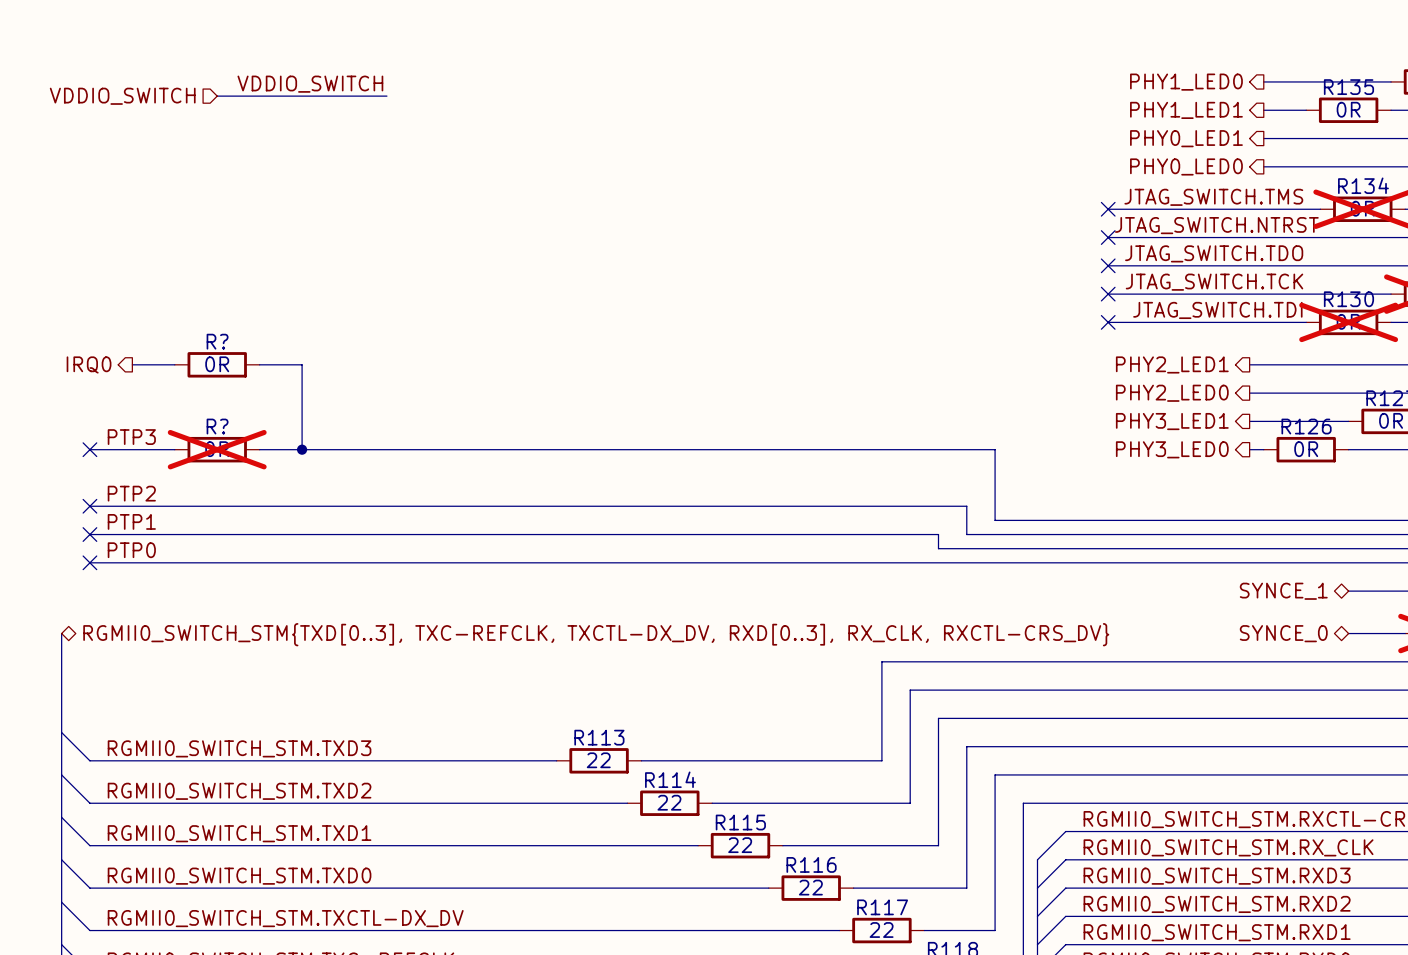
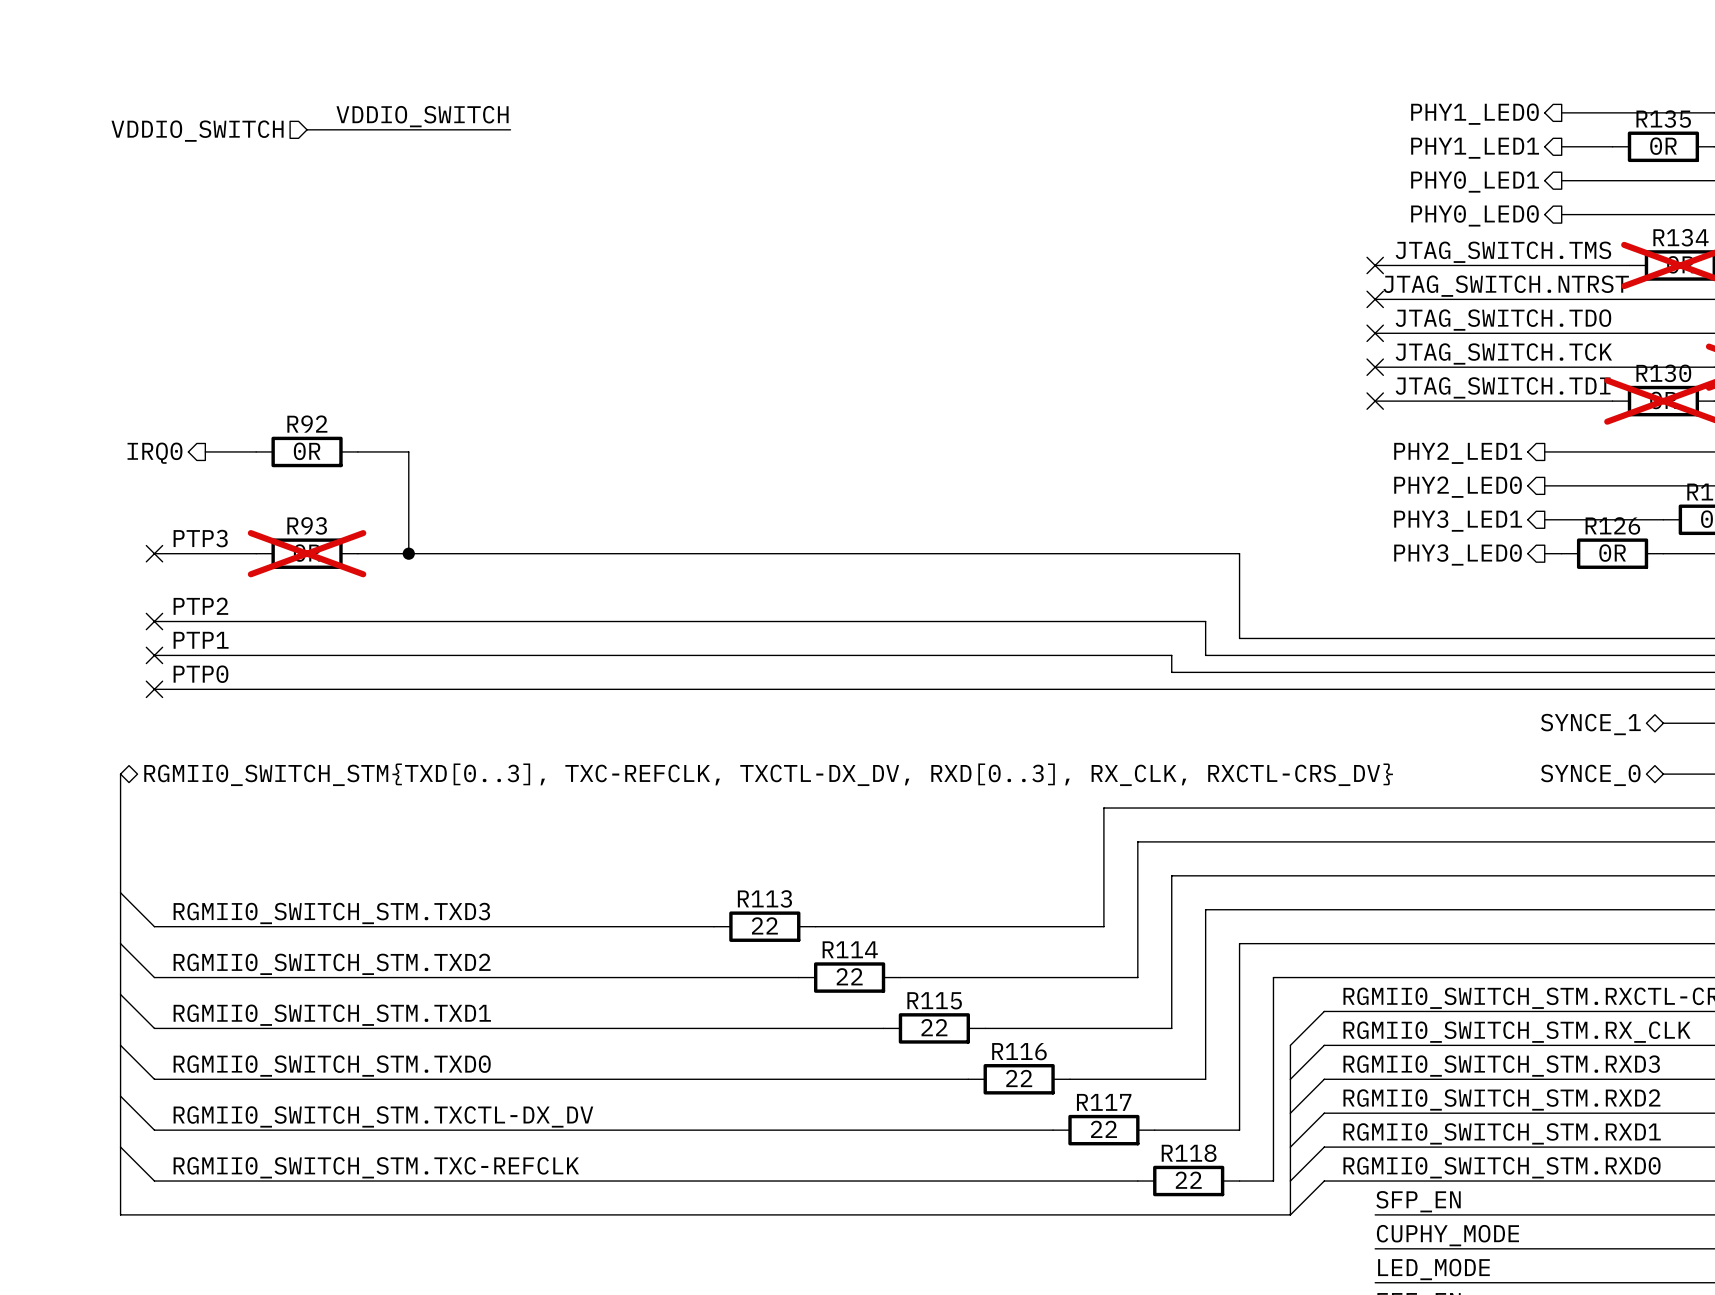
R? name: R? (217, 341) -> R92 (307, 424)
R? name: R? (217, 426) -> R93 (307, 525)

